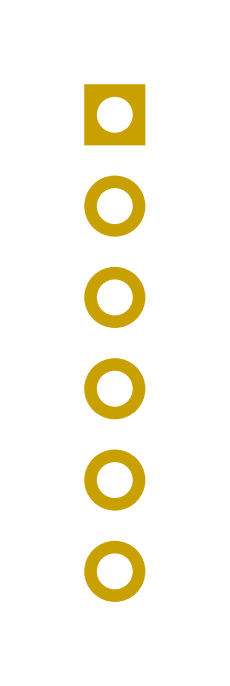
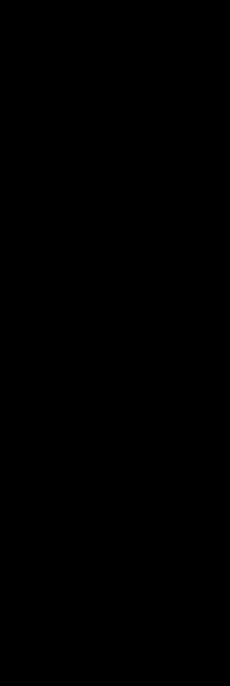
part: (114, 343) -> none

